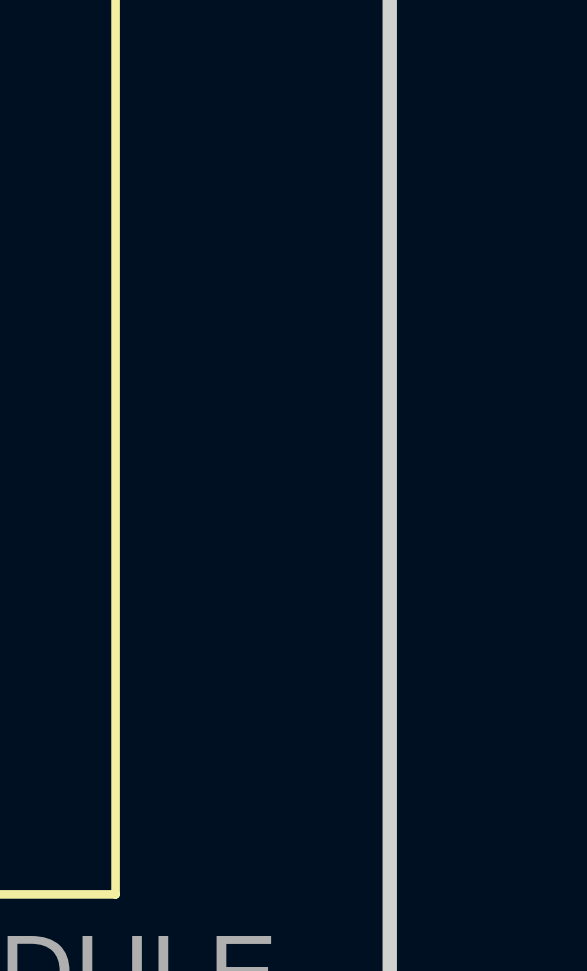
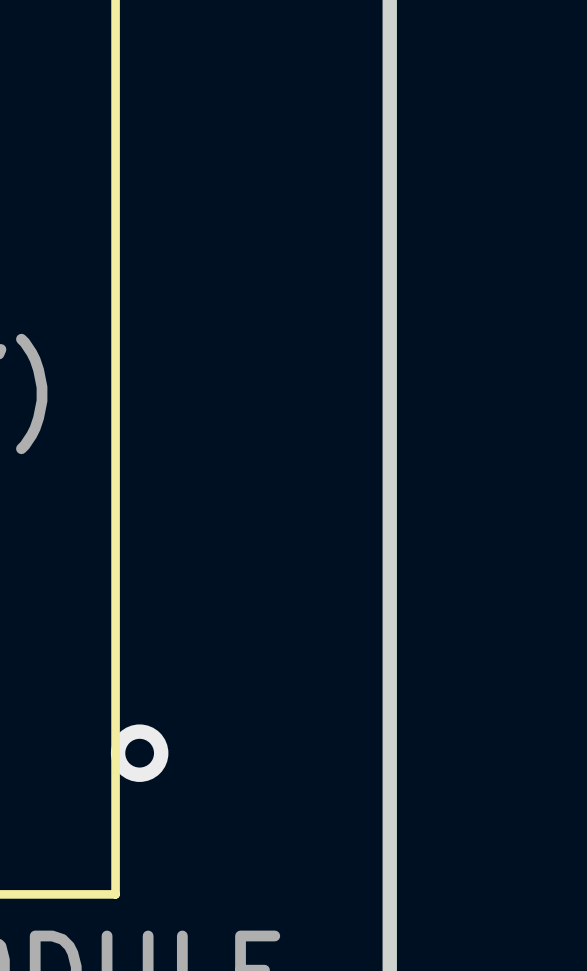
via: none -> (139, 753)

